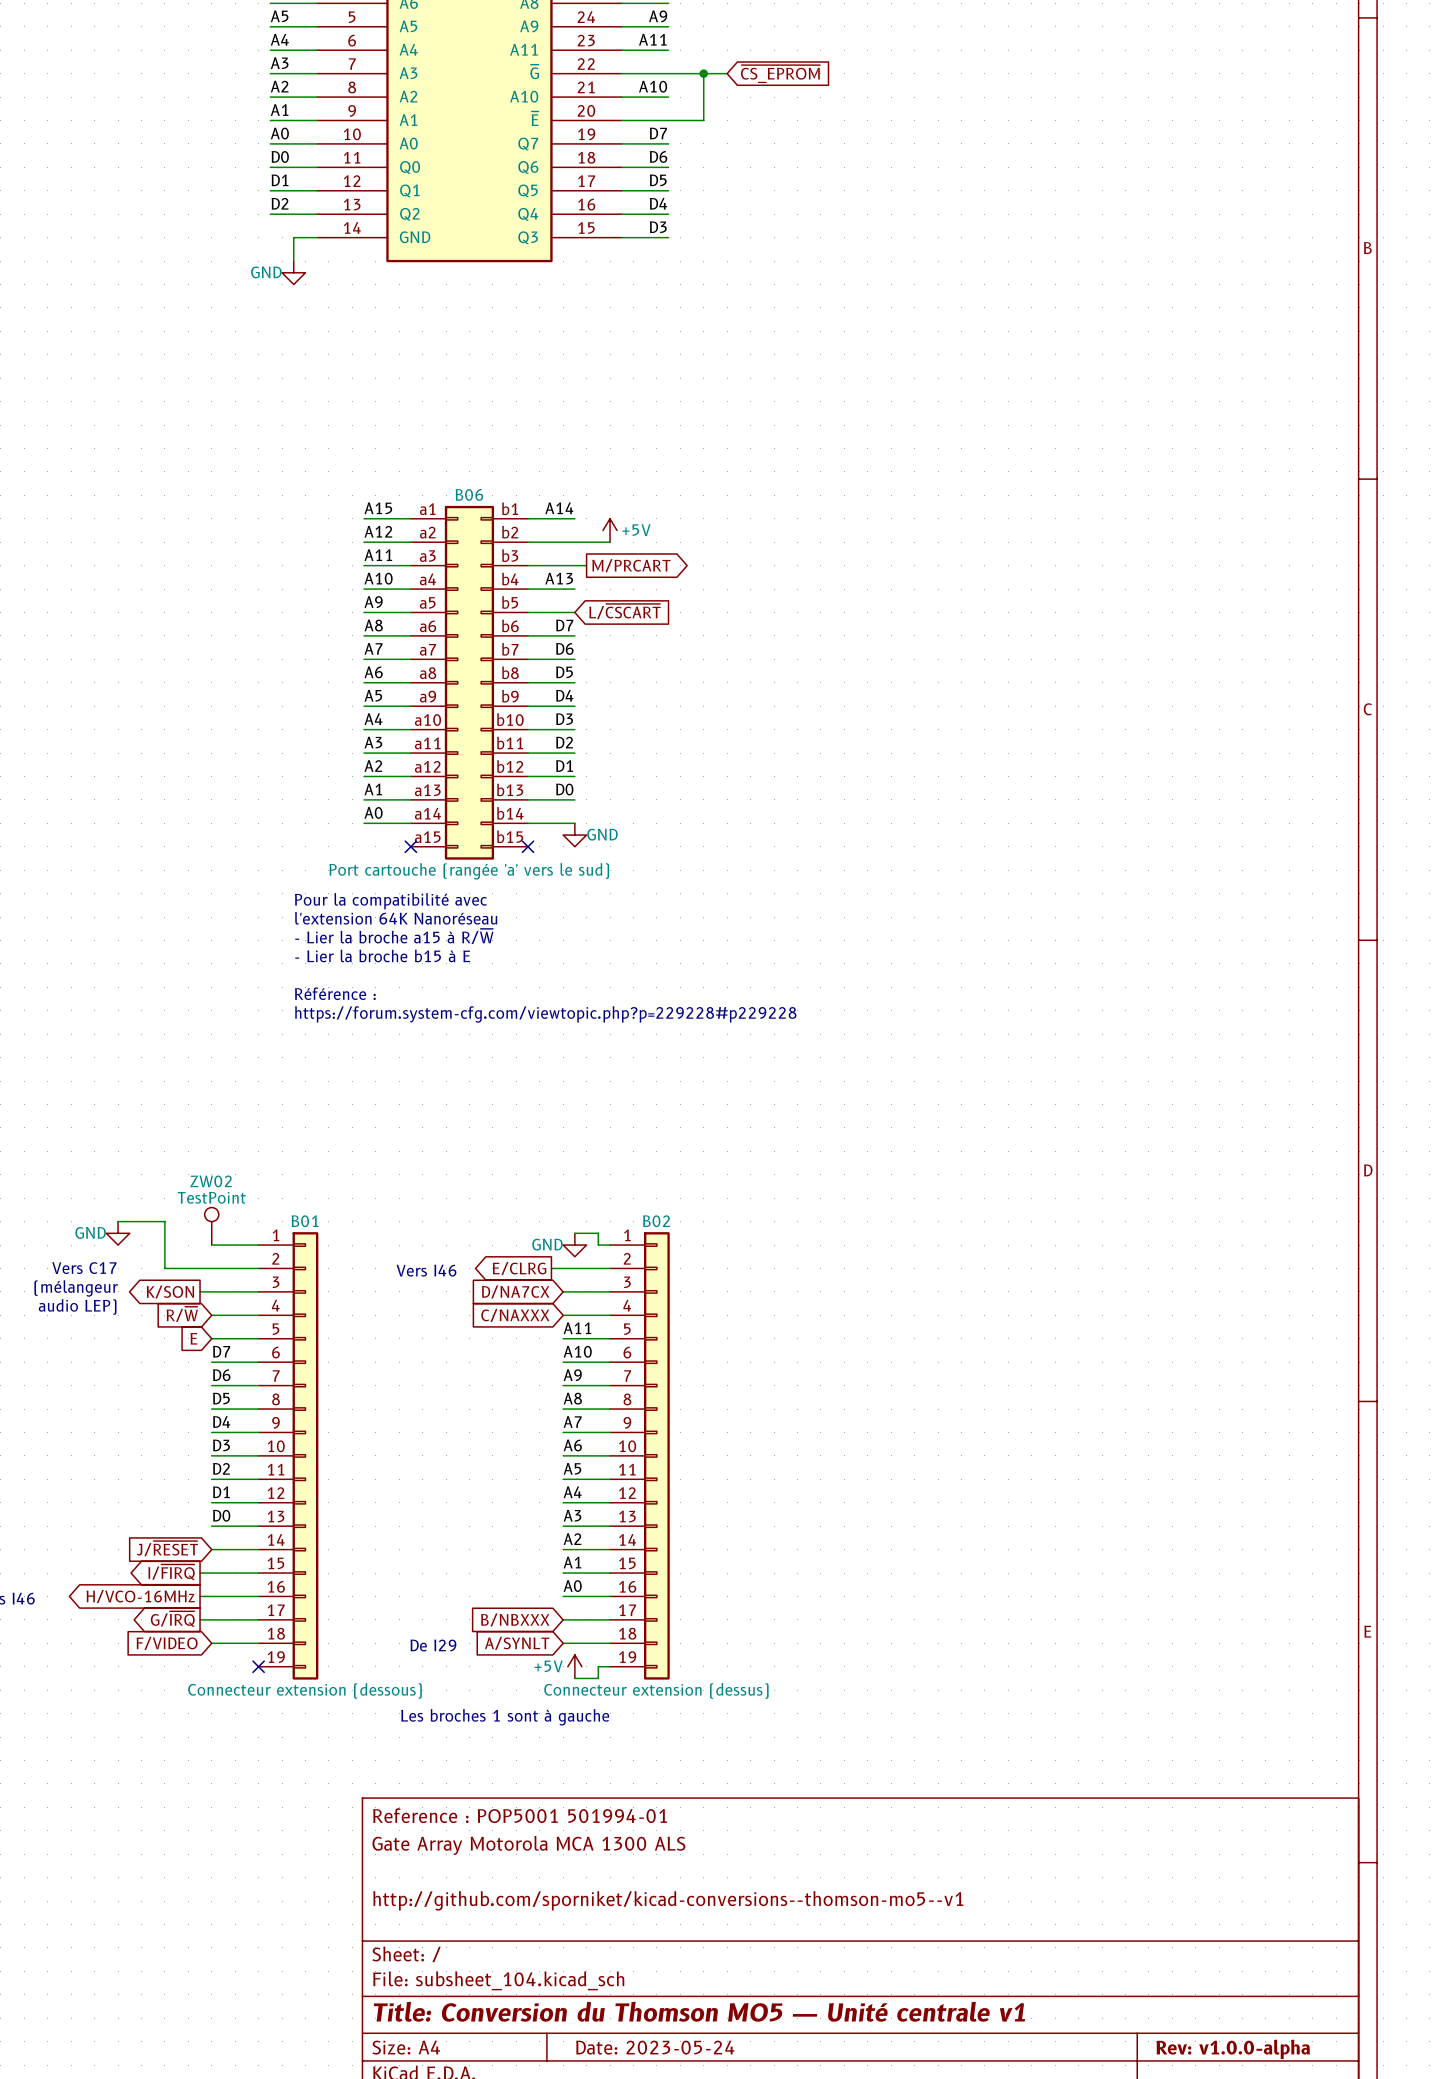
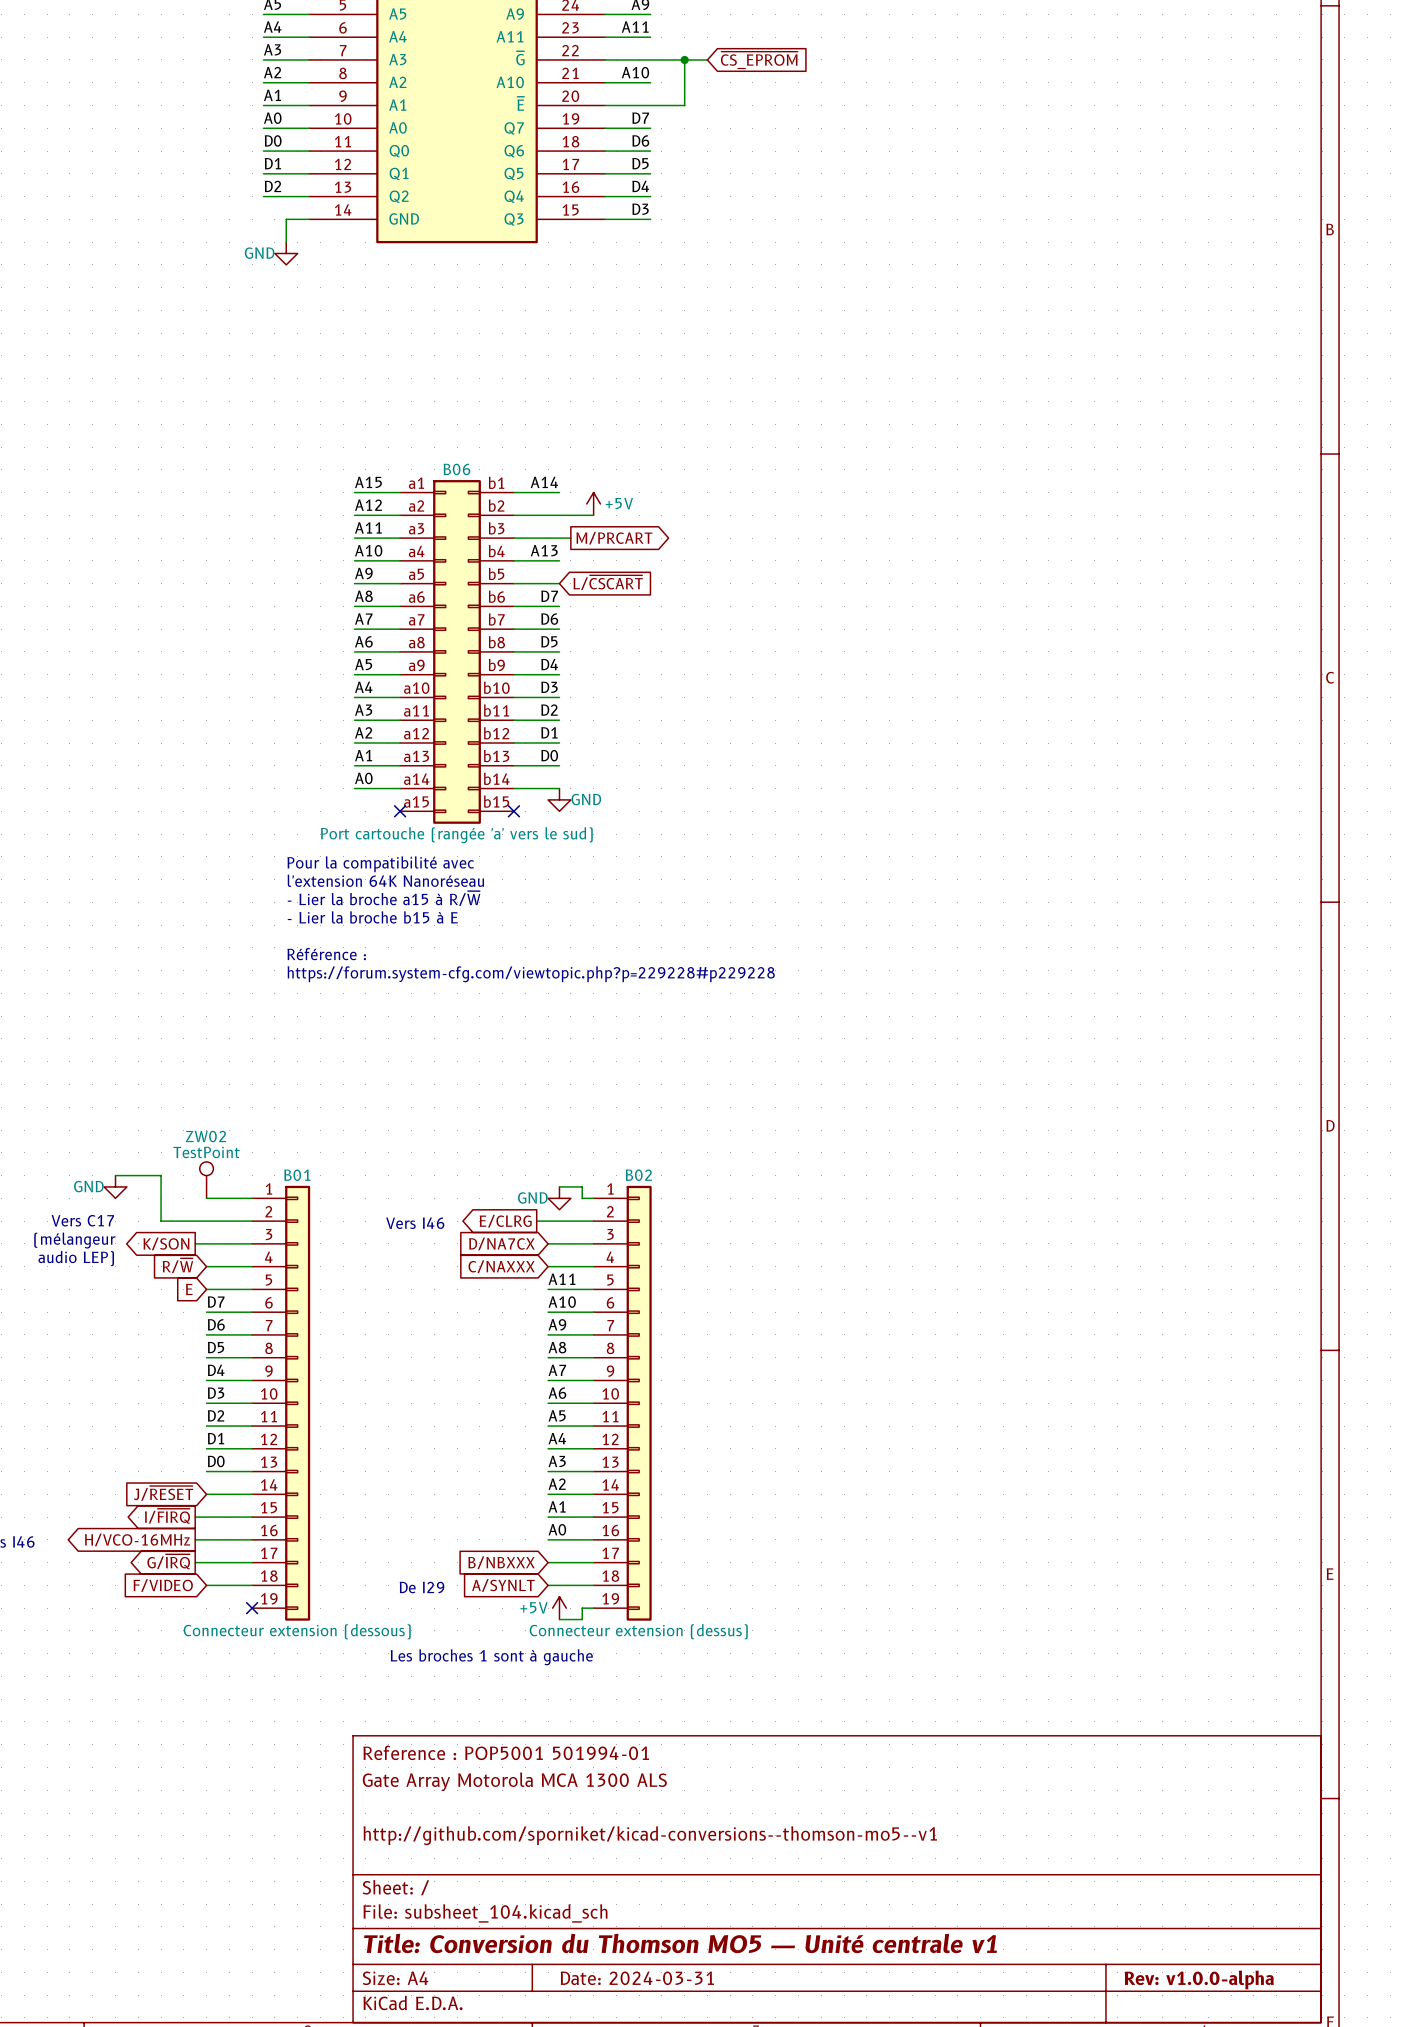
title block: Date: 2023-05-24 (655, 2047) -> Date: 2024-03-31 (637, 1978)

